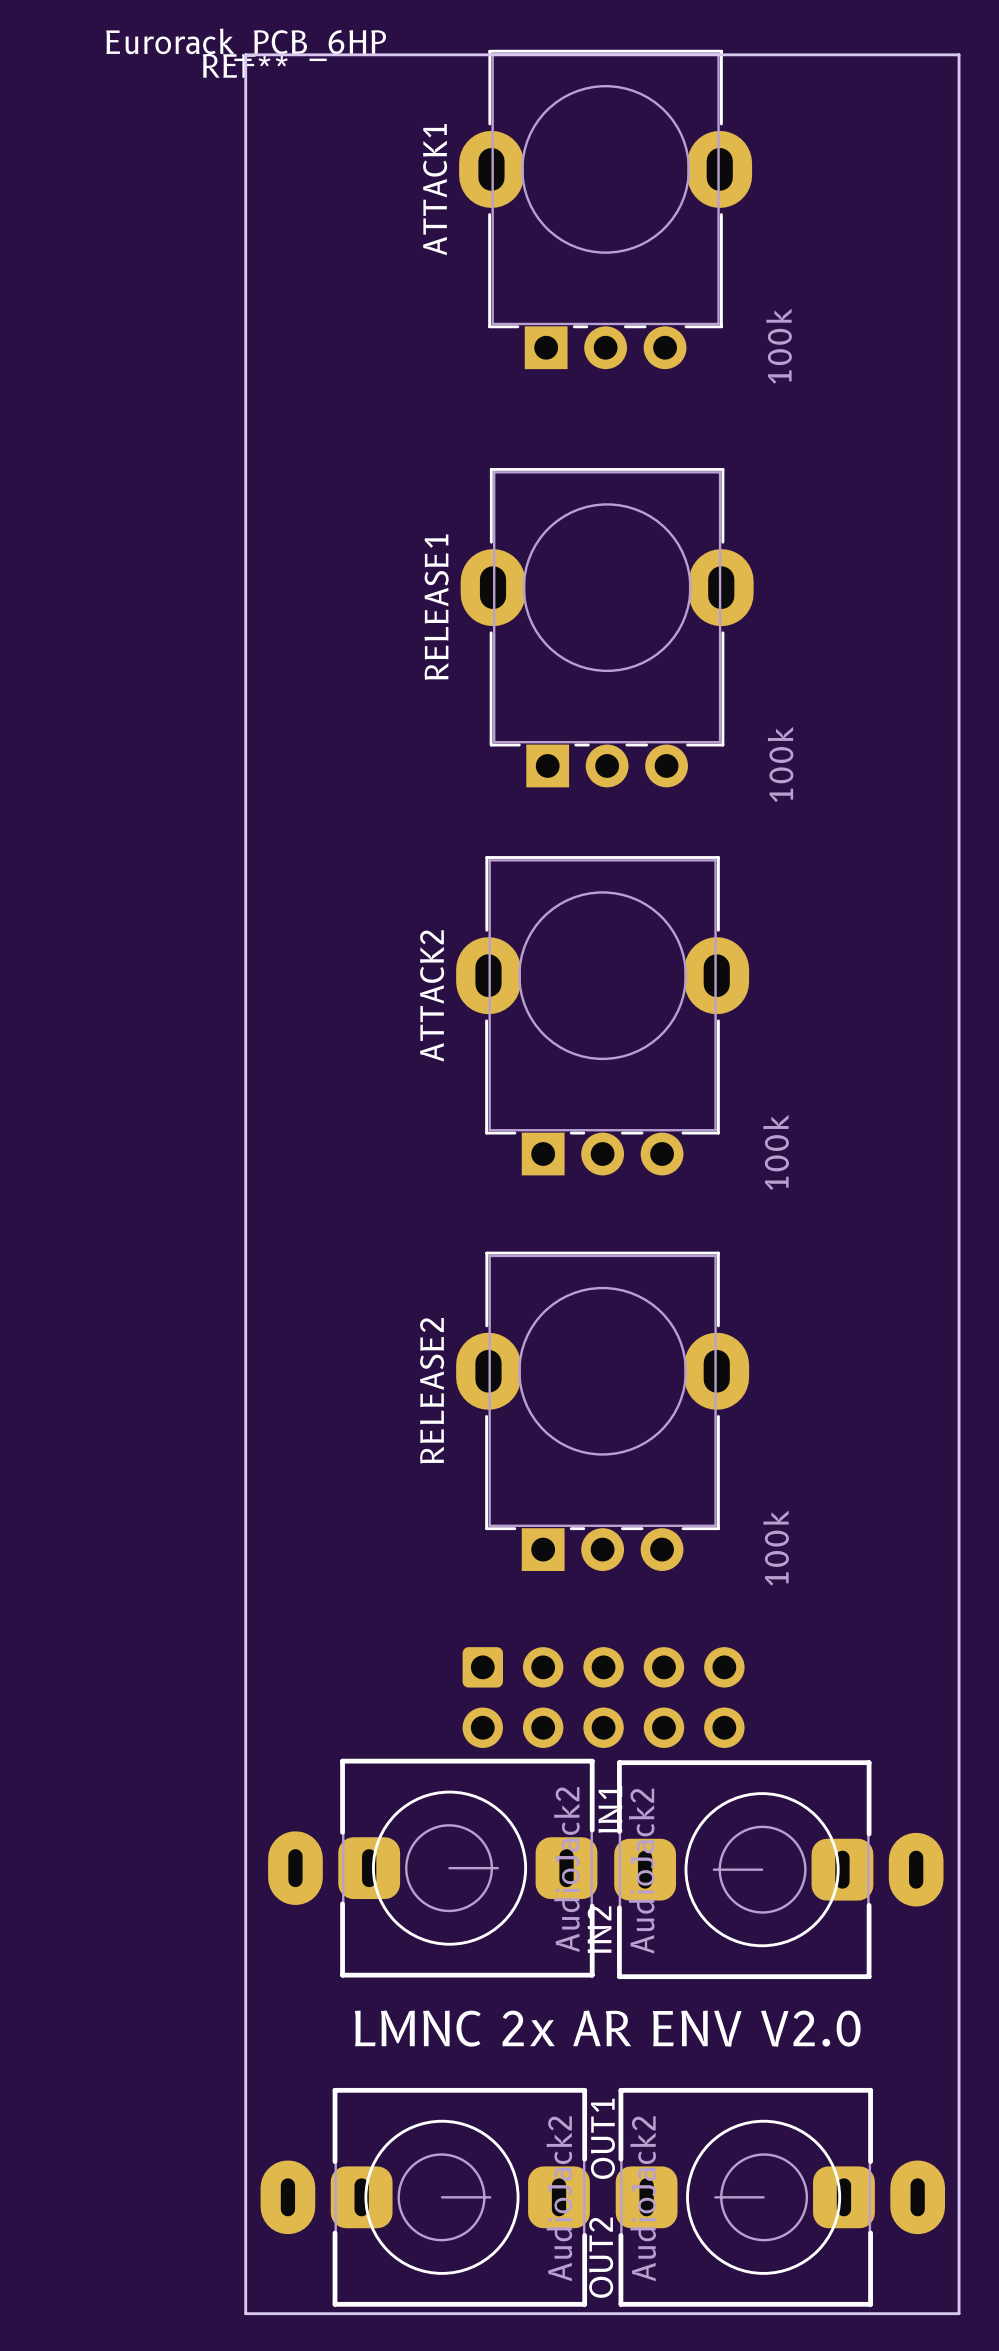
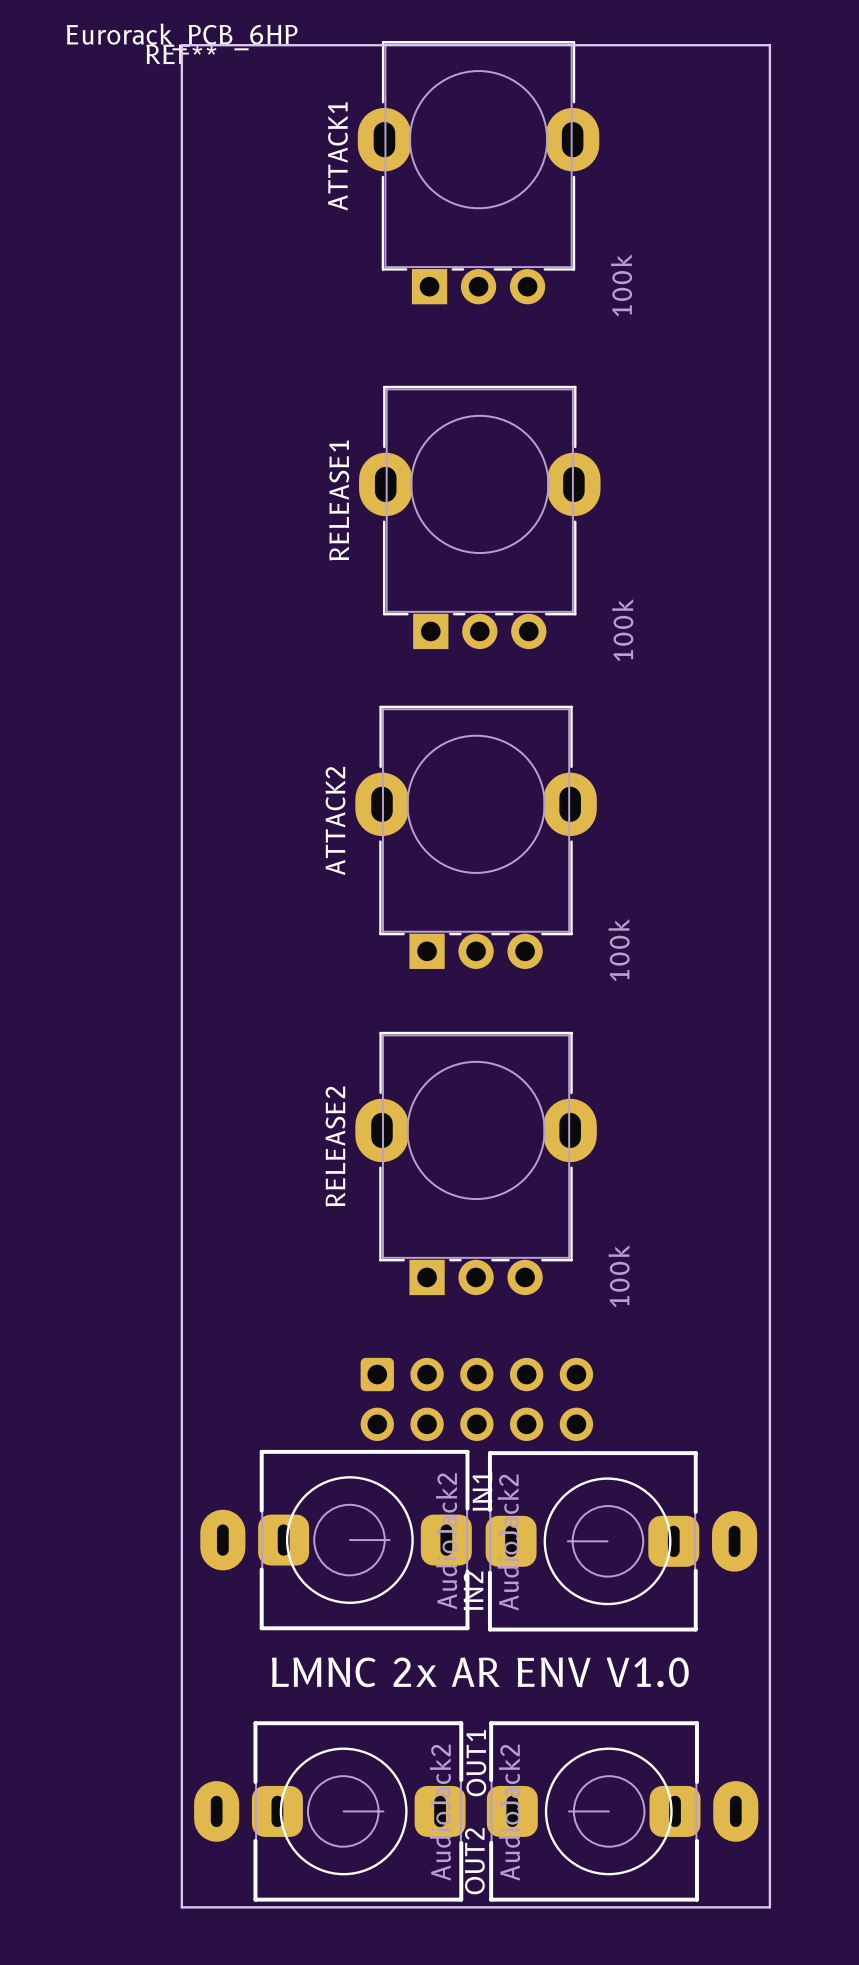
text: LMNC 2x AR ENV V2.0 (607, 2028) -> LMNC 2x AR ENV V1.0 (480, 1672)

